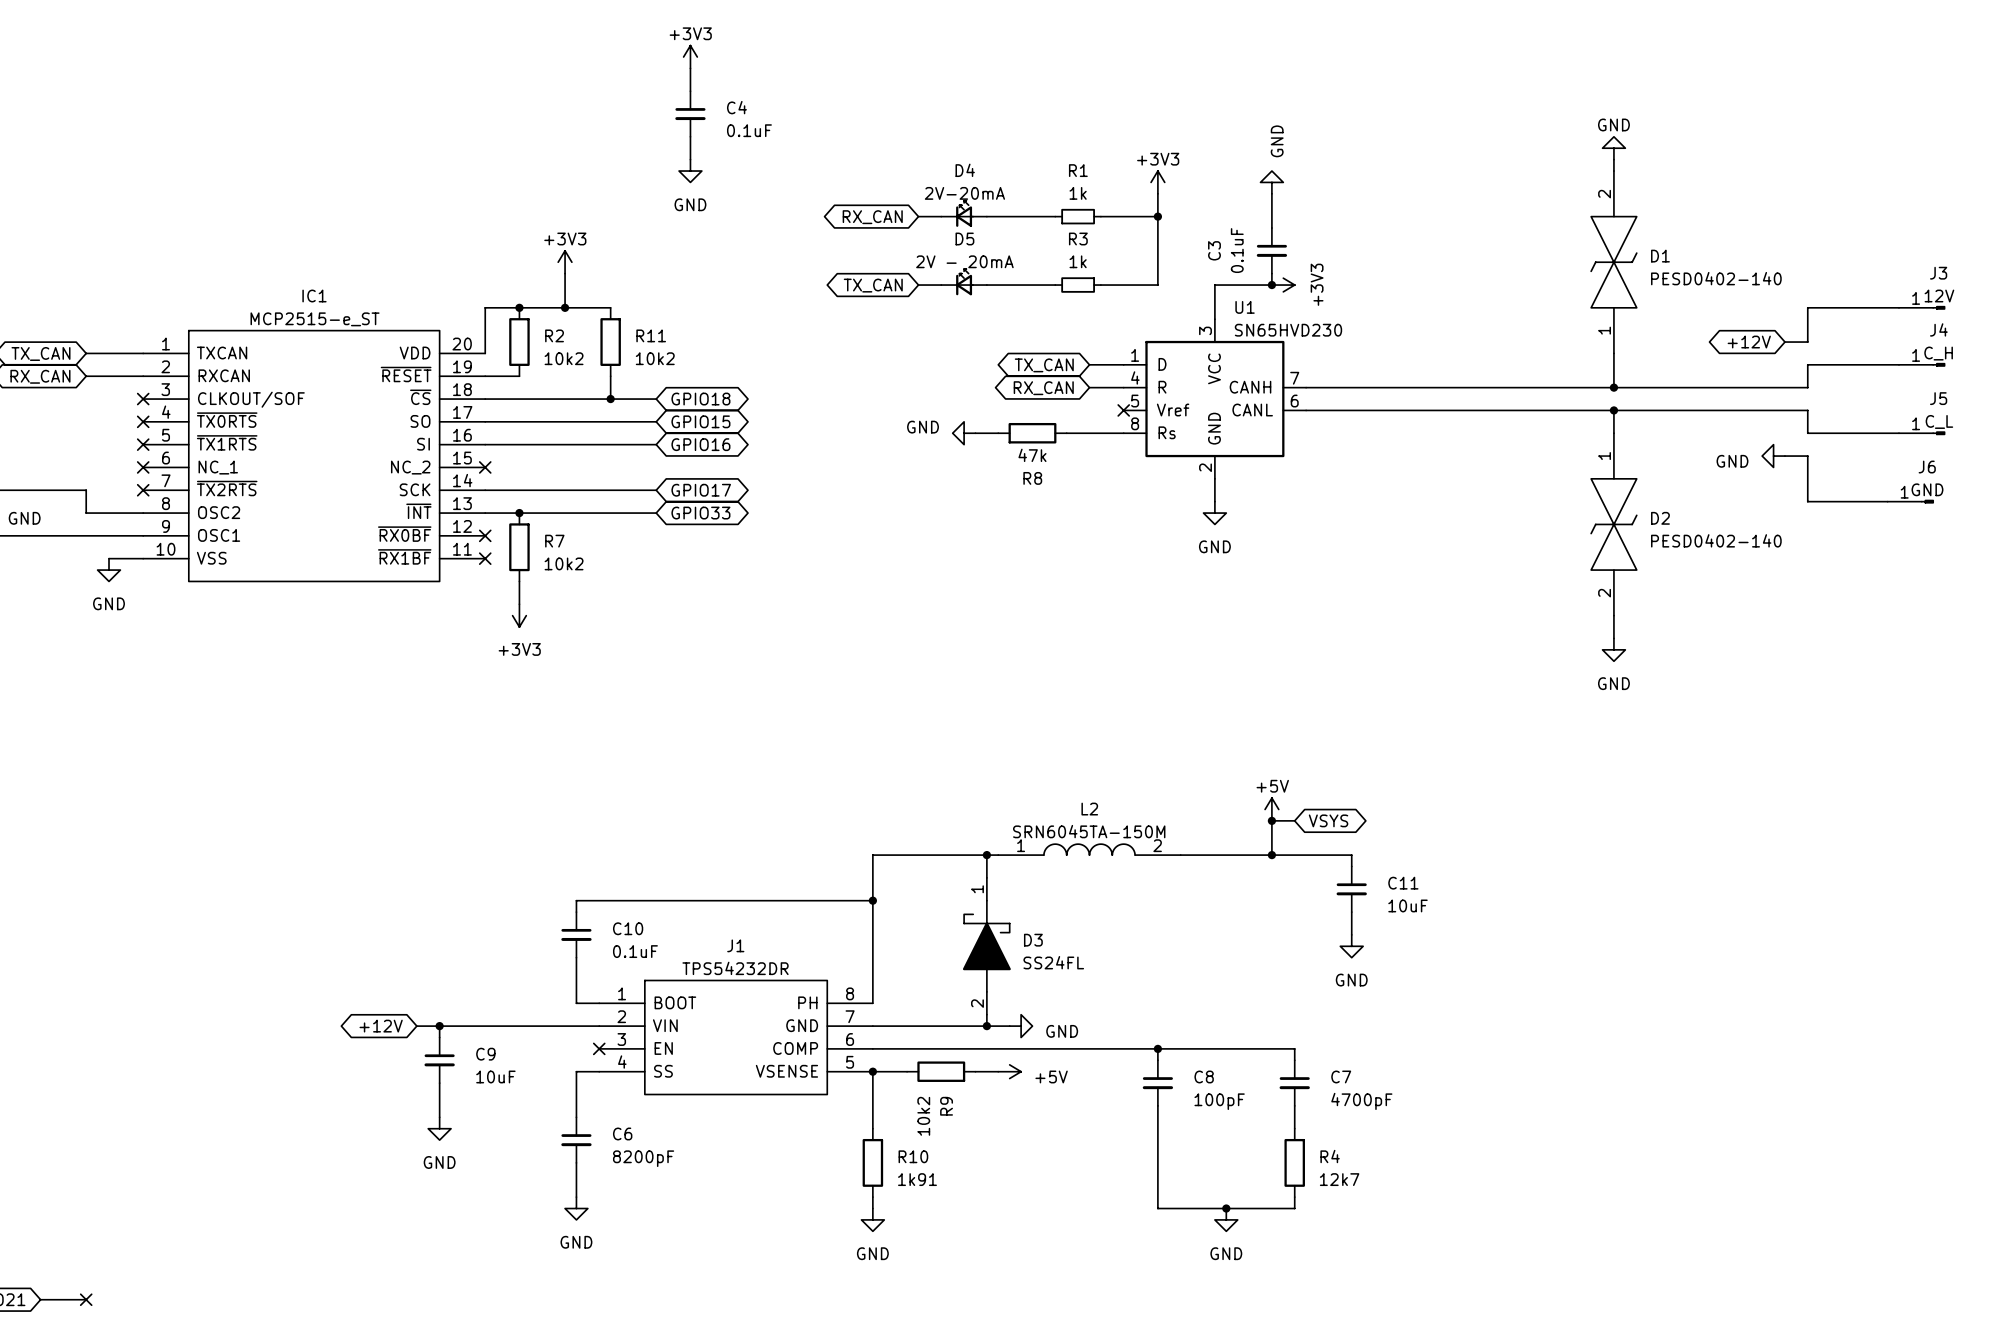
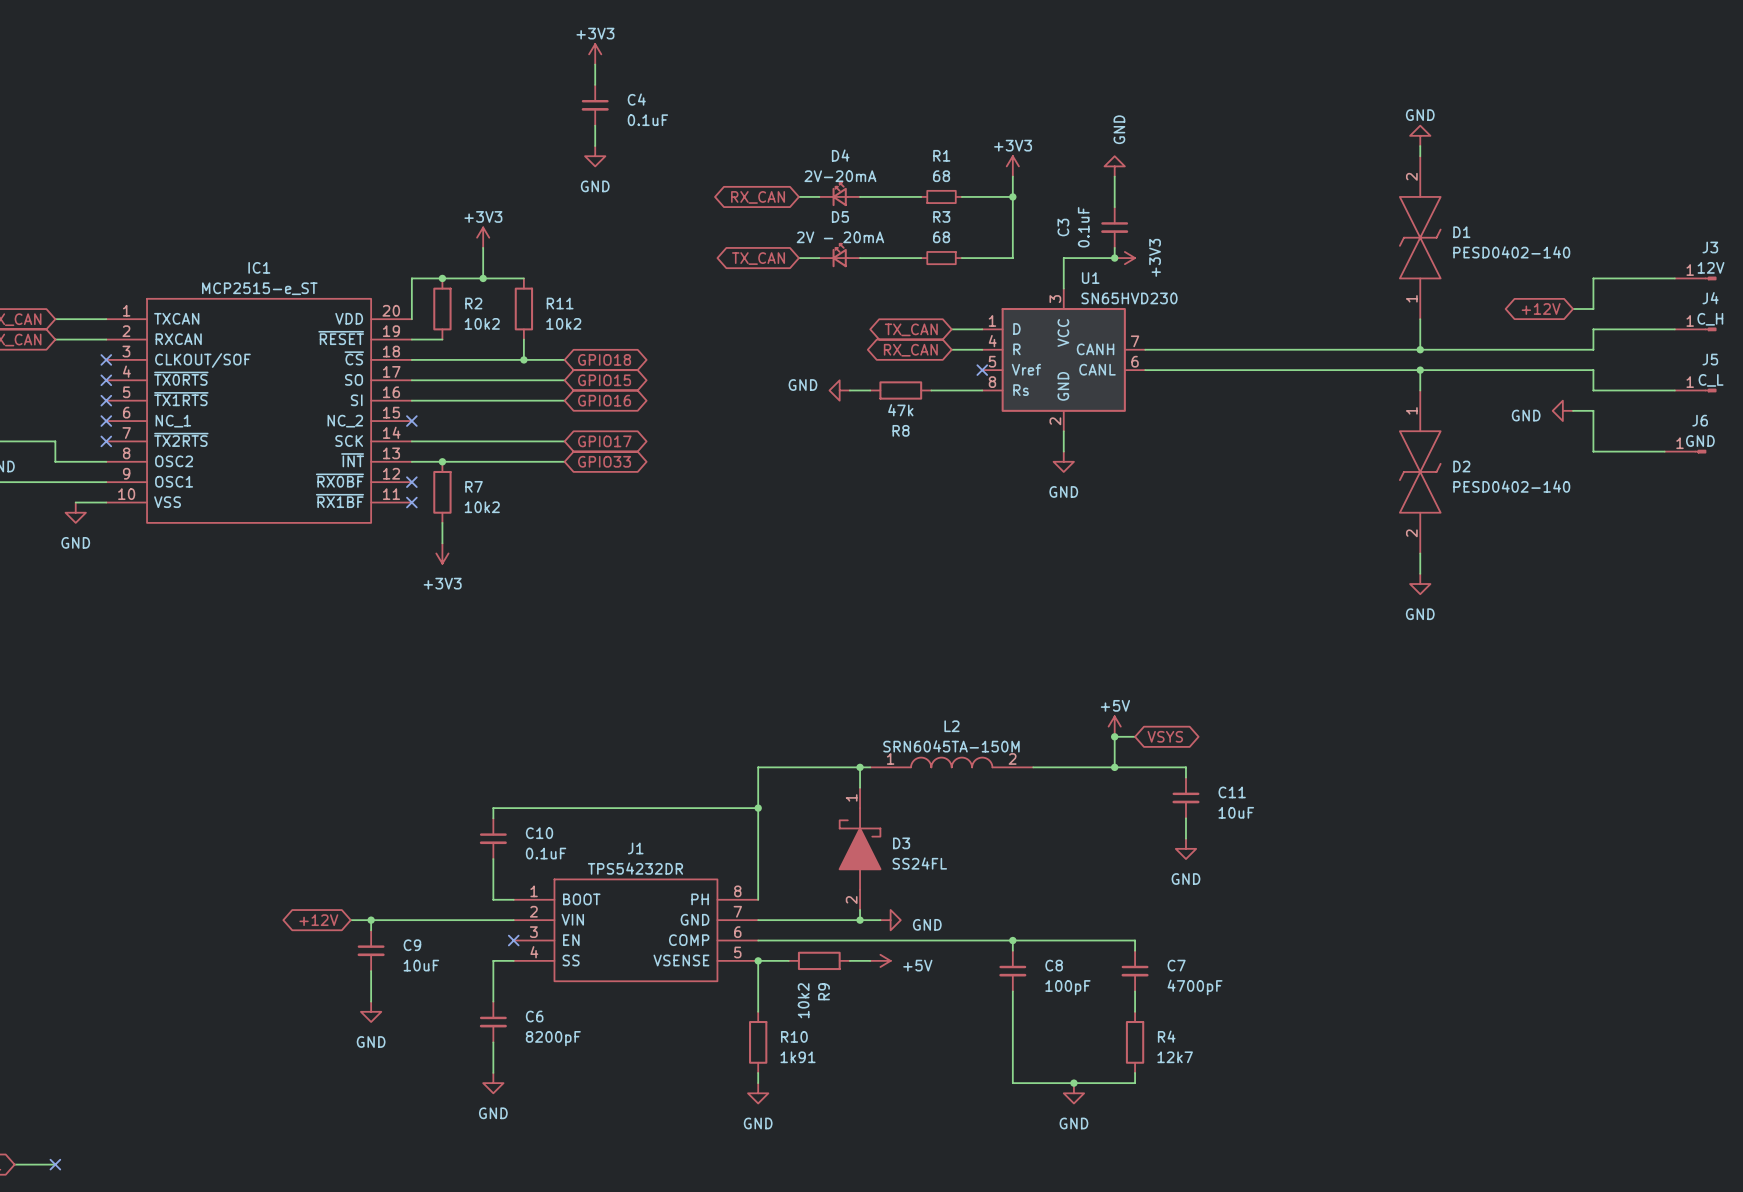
R1 value: 1k (1078, 193) -> 68 (941, 176)
R3 value: 1k (1078, 261) -> 68 (941, 237)

